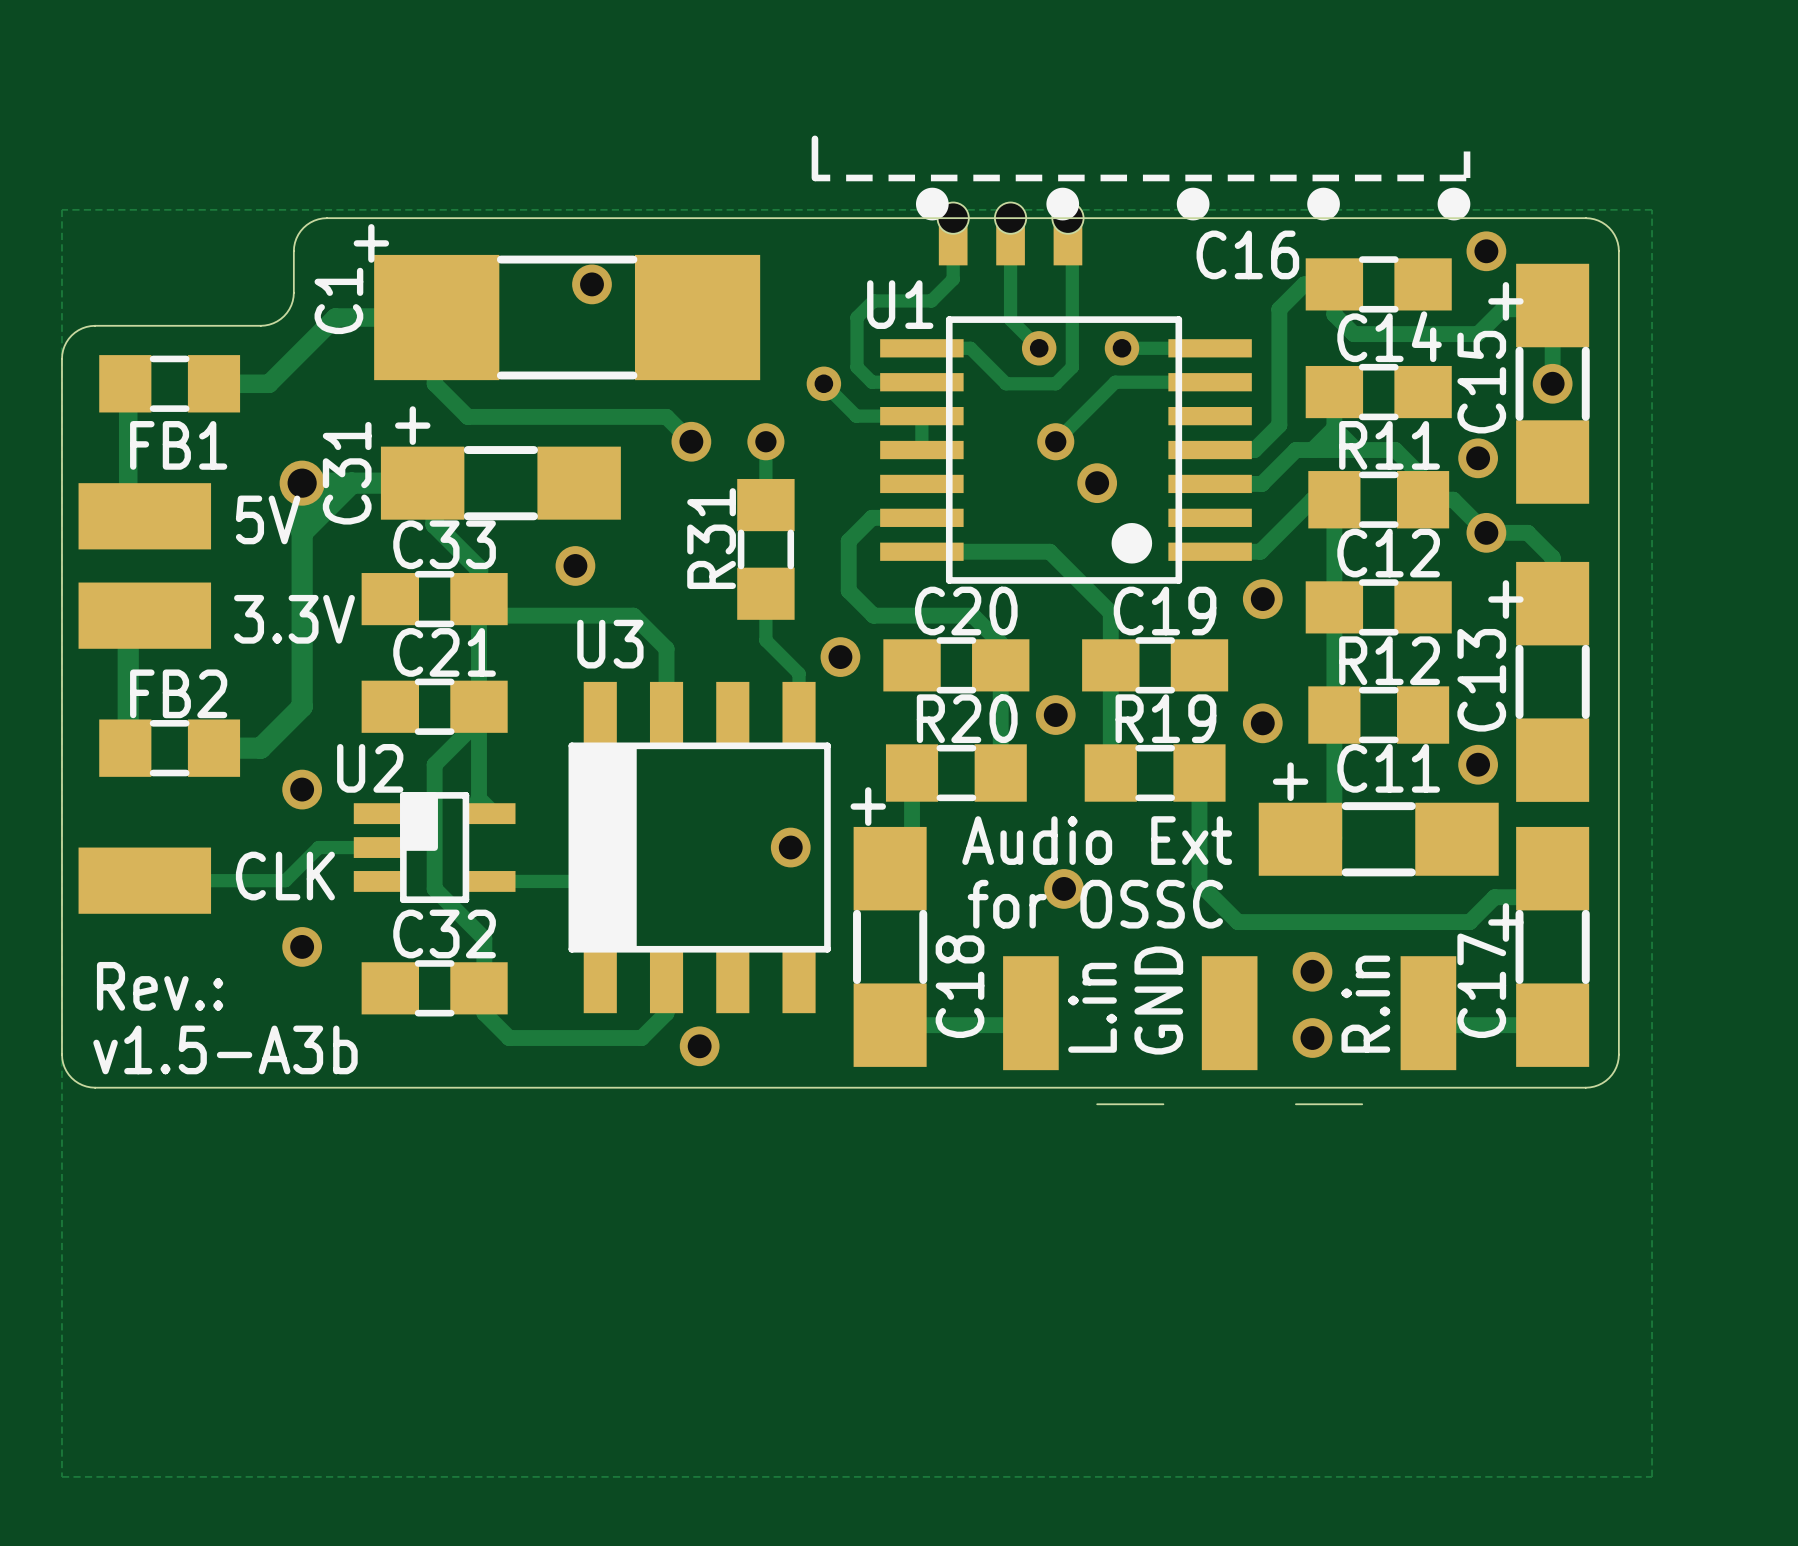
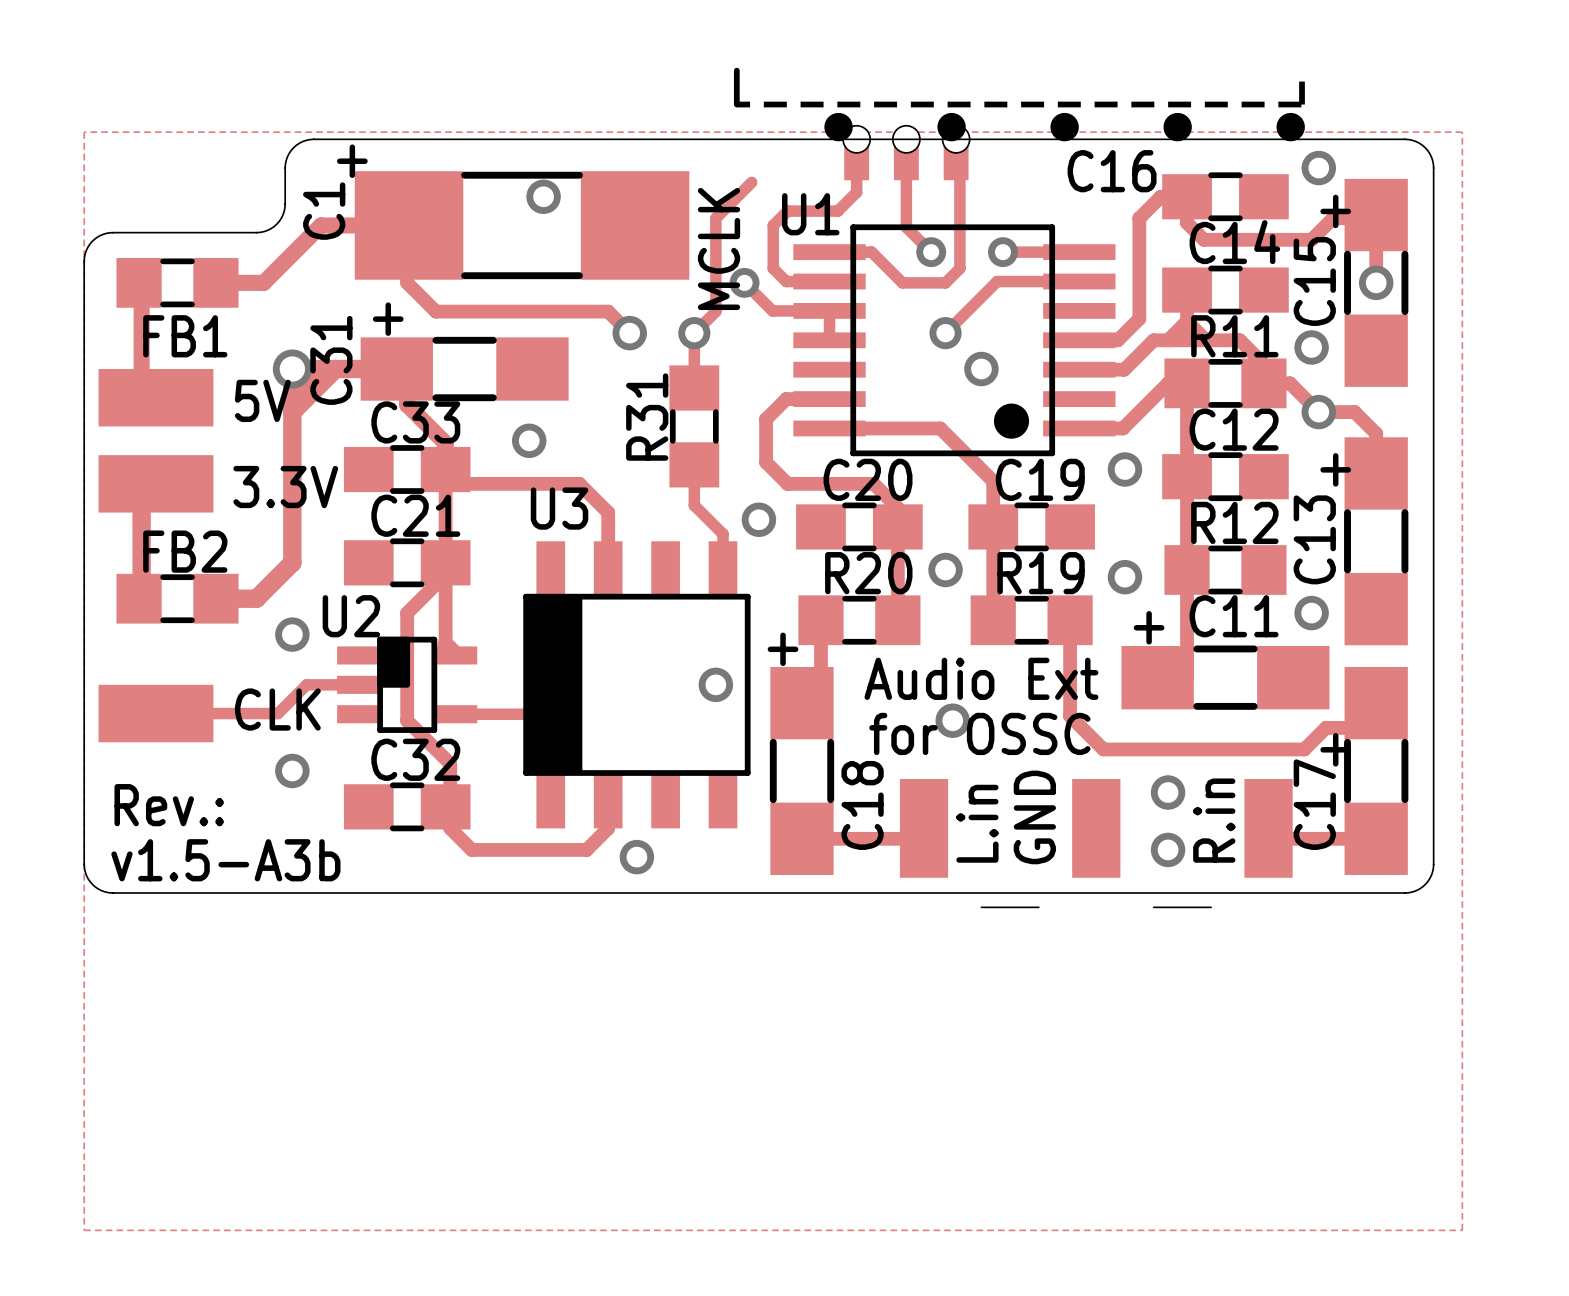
track: none -> (751, 182) (715, 218) (715, 311) (694, 333)
text: none -> MCLK (719, 248)

